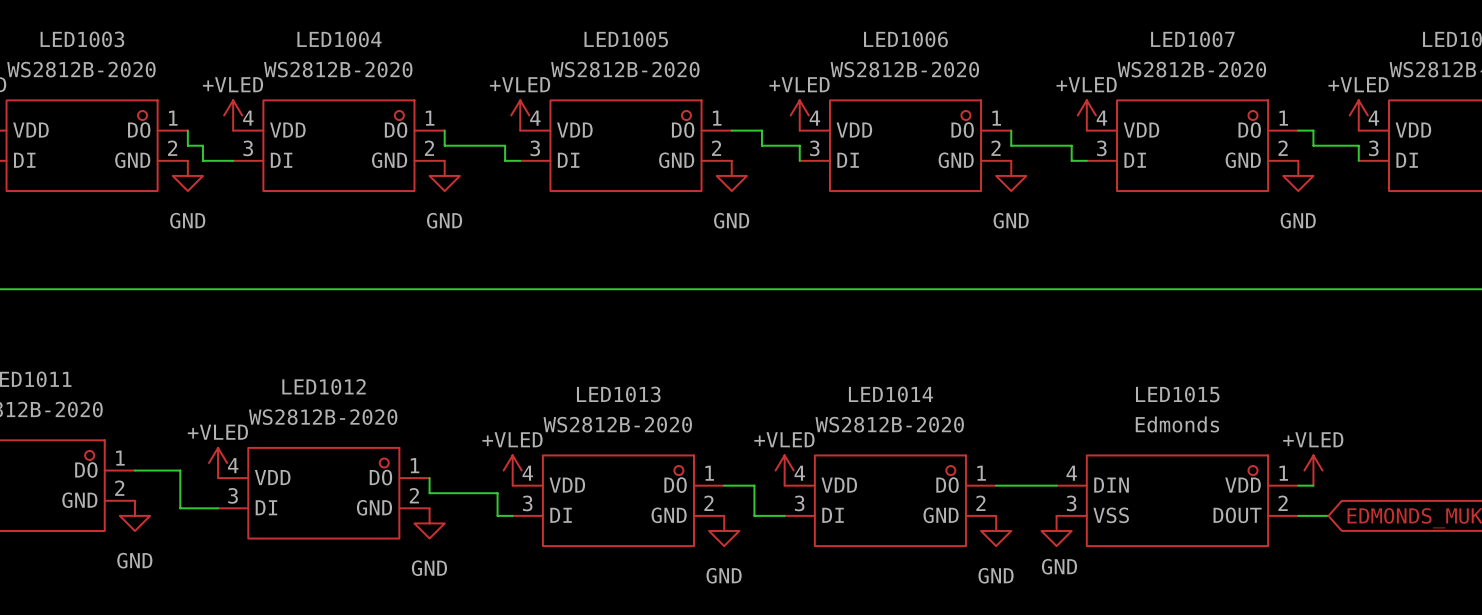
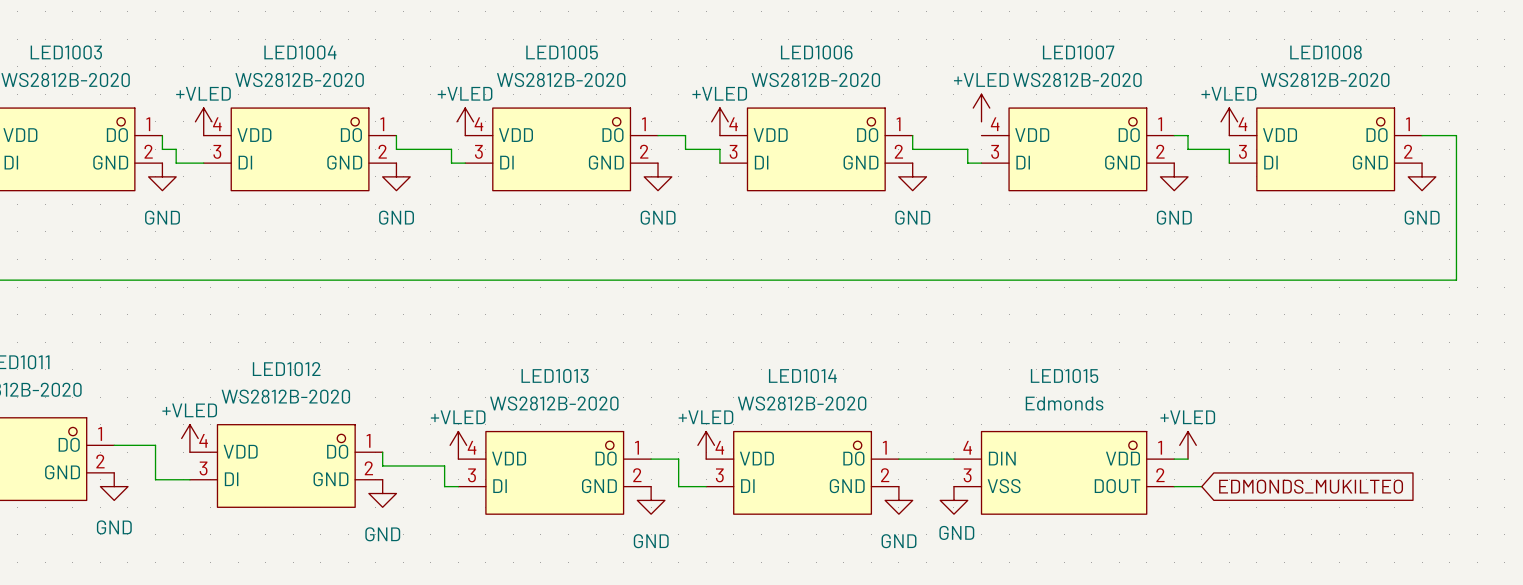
power symbol position: +VLED (1086, 115) -> +VLED (981, 108)

